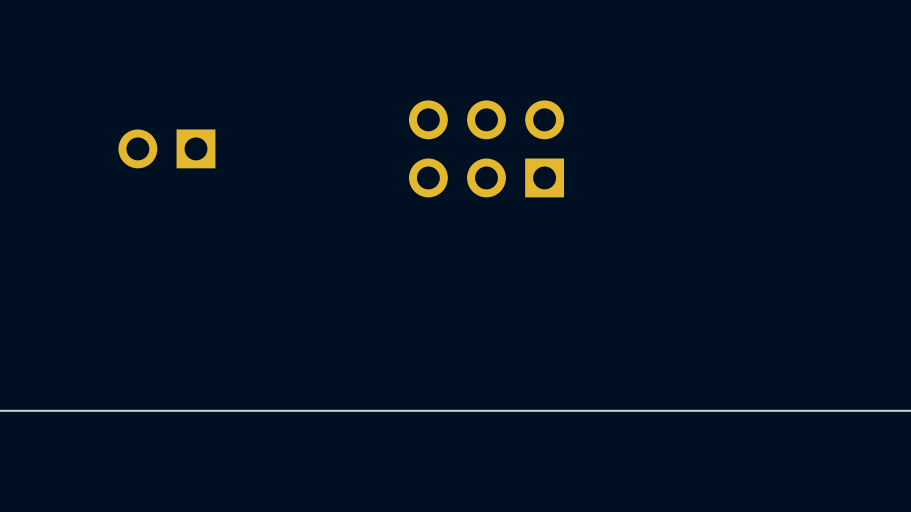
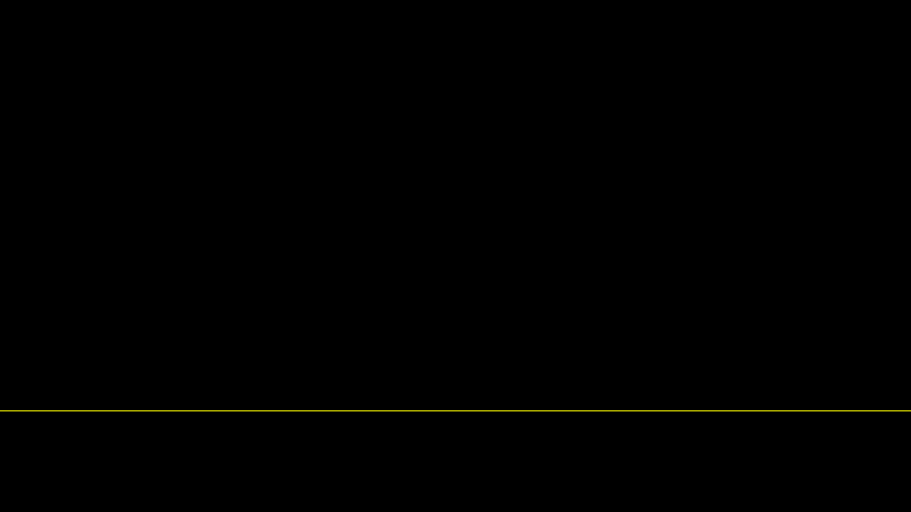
part: (166, 148) -> none
part: (486, 148) -> none

